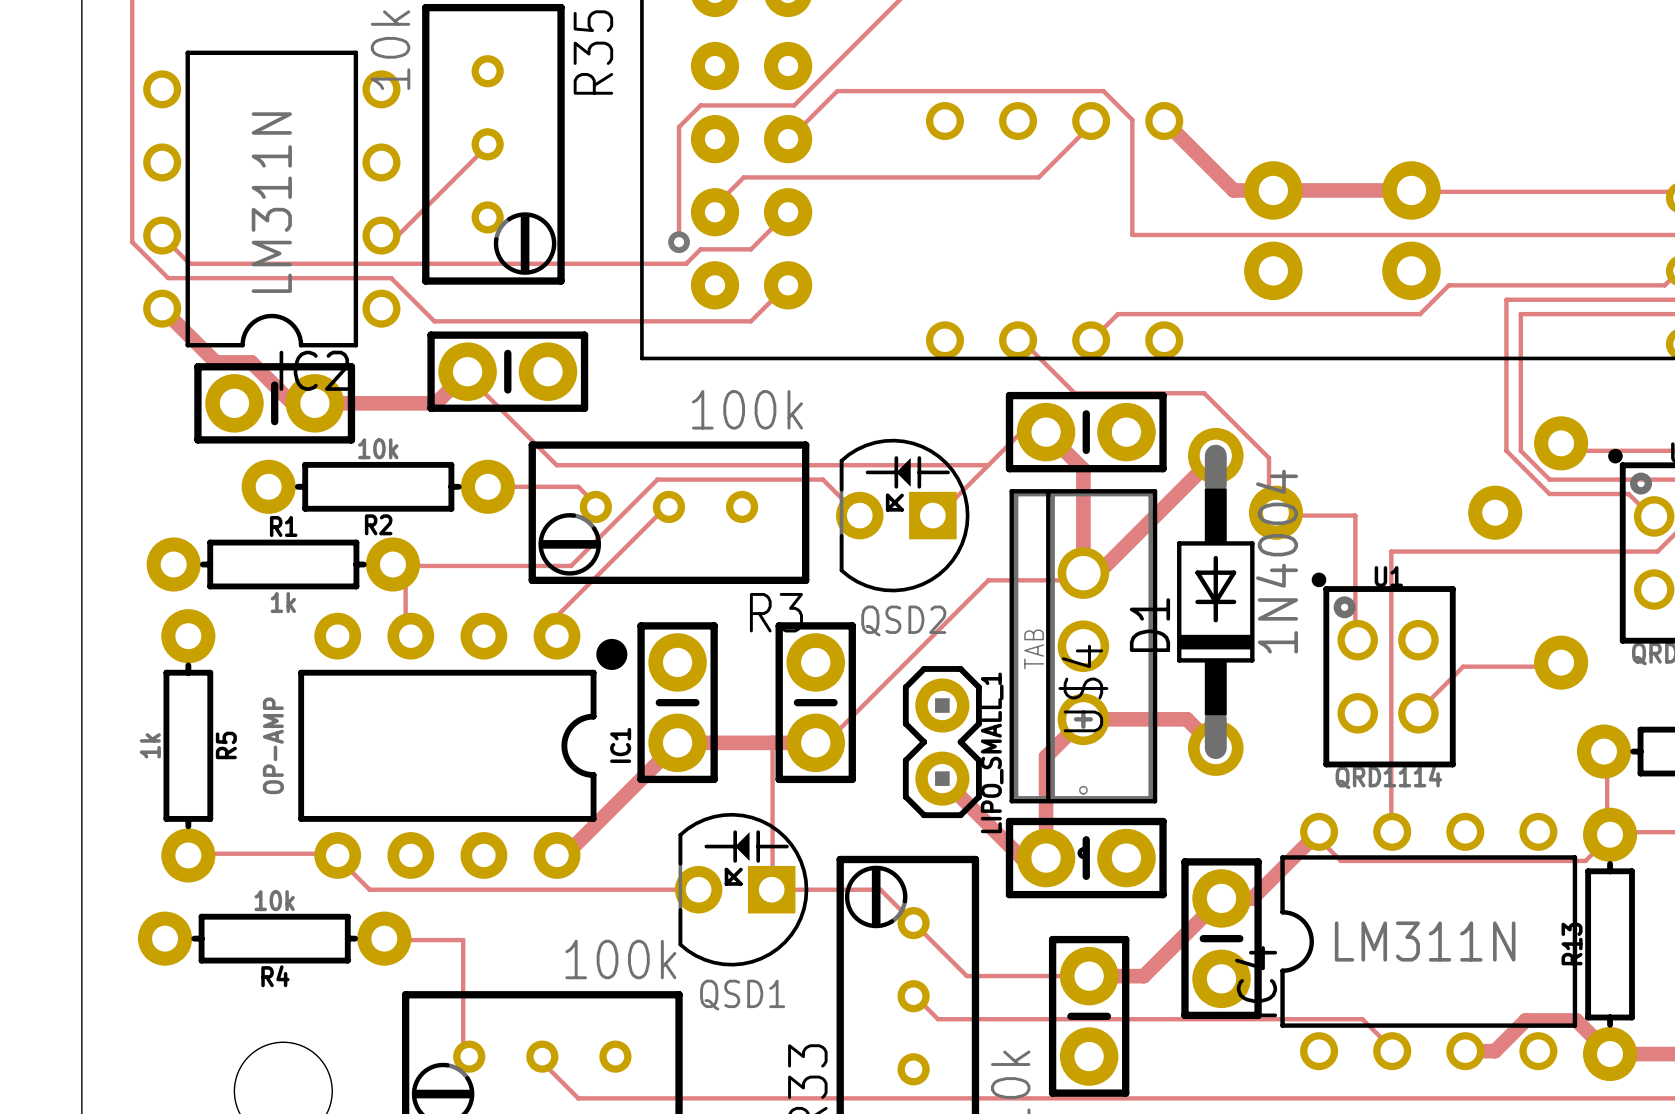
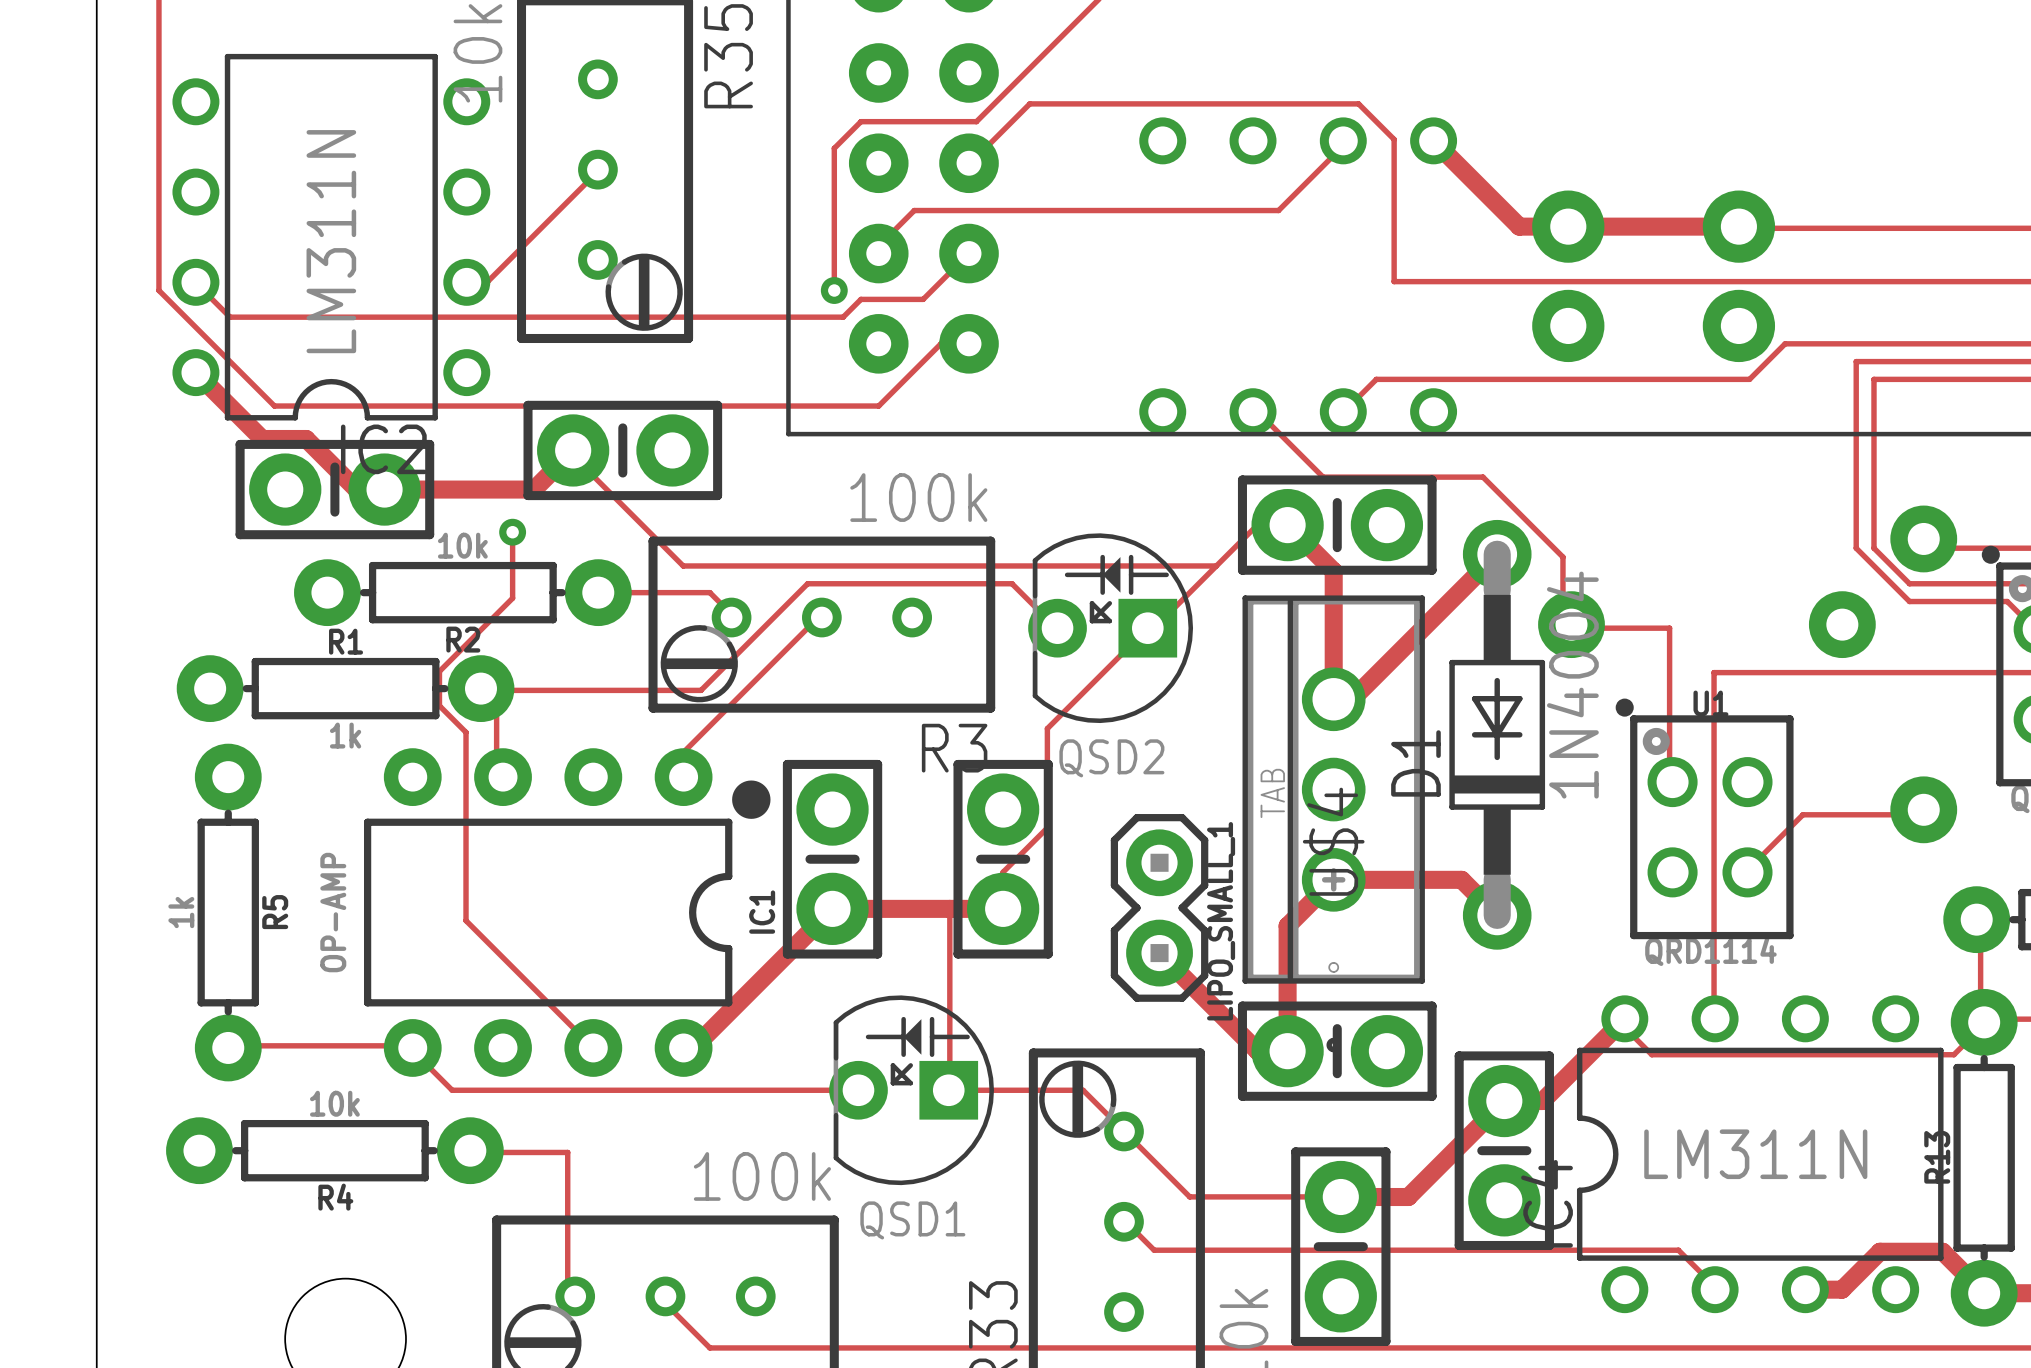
track: (168, 278) (391, 278) (434, 321) (750, 321) (786, 285) -> (203, 334) (274, 406) (878, 406) (940, 343) (967, 343)
track: none -> (512, 532) (512, 598) (439, 671) (439, 705) (466, 732) (466, 920) (593, 1047)
via: none -> (512, 532)
track: (1083, 573) (1081, 580) (988, 580) (822, 745) (815, 742) -> (1147, 628) (1047, 728) (1047, 827) (1003, 872) (1003, 908)

